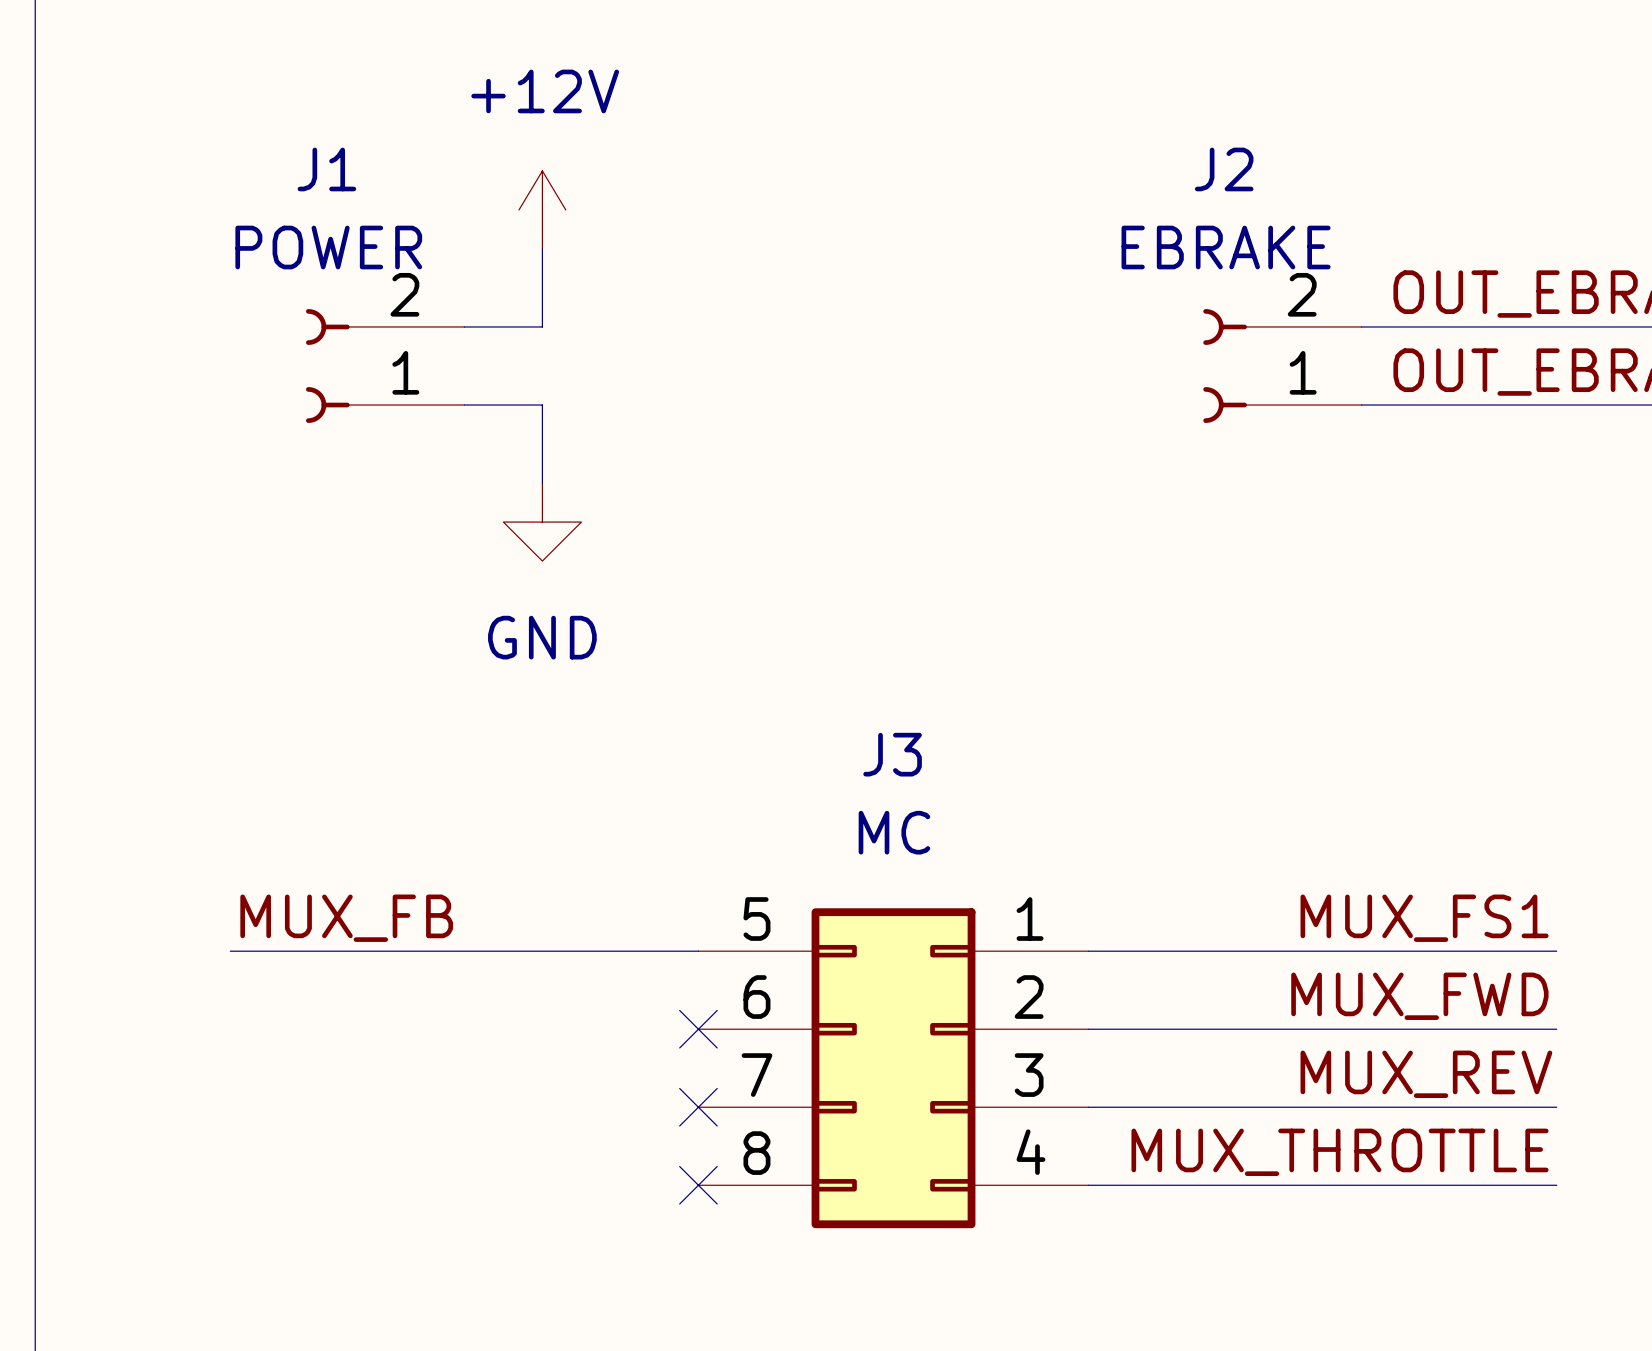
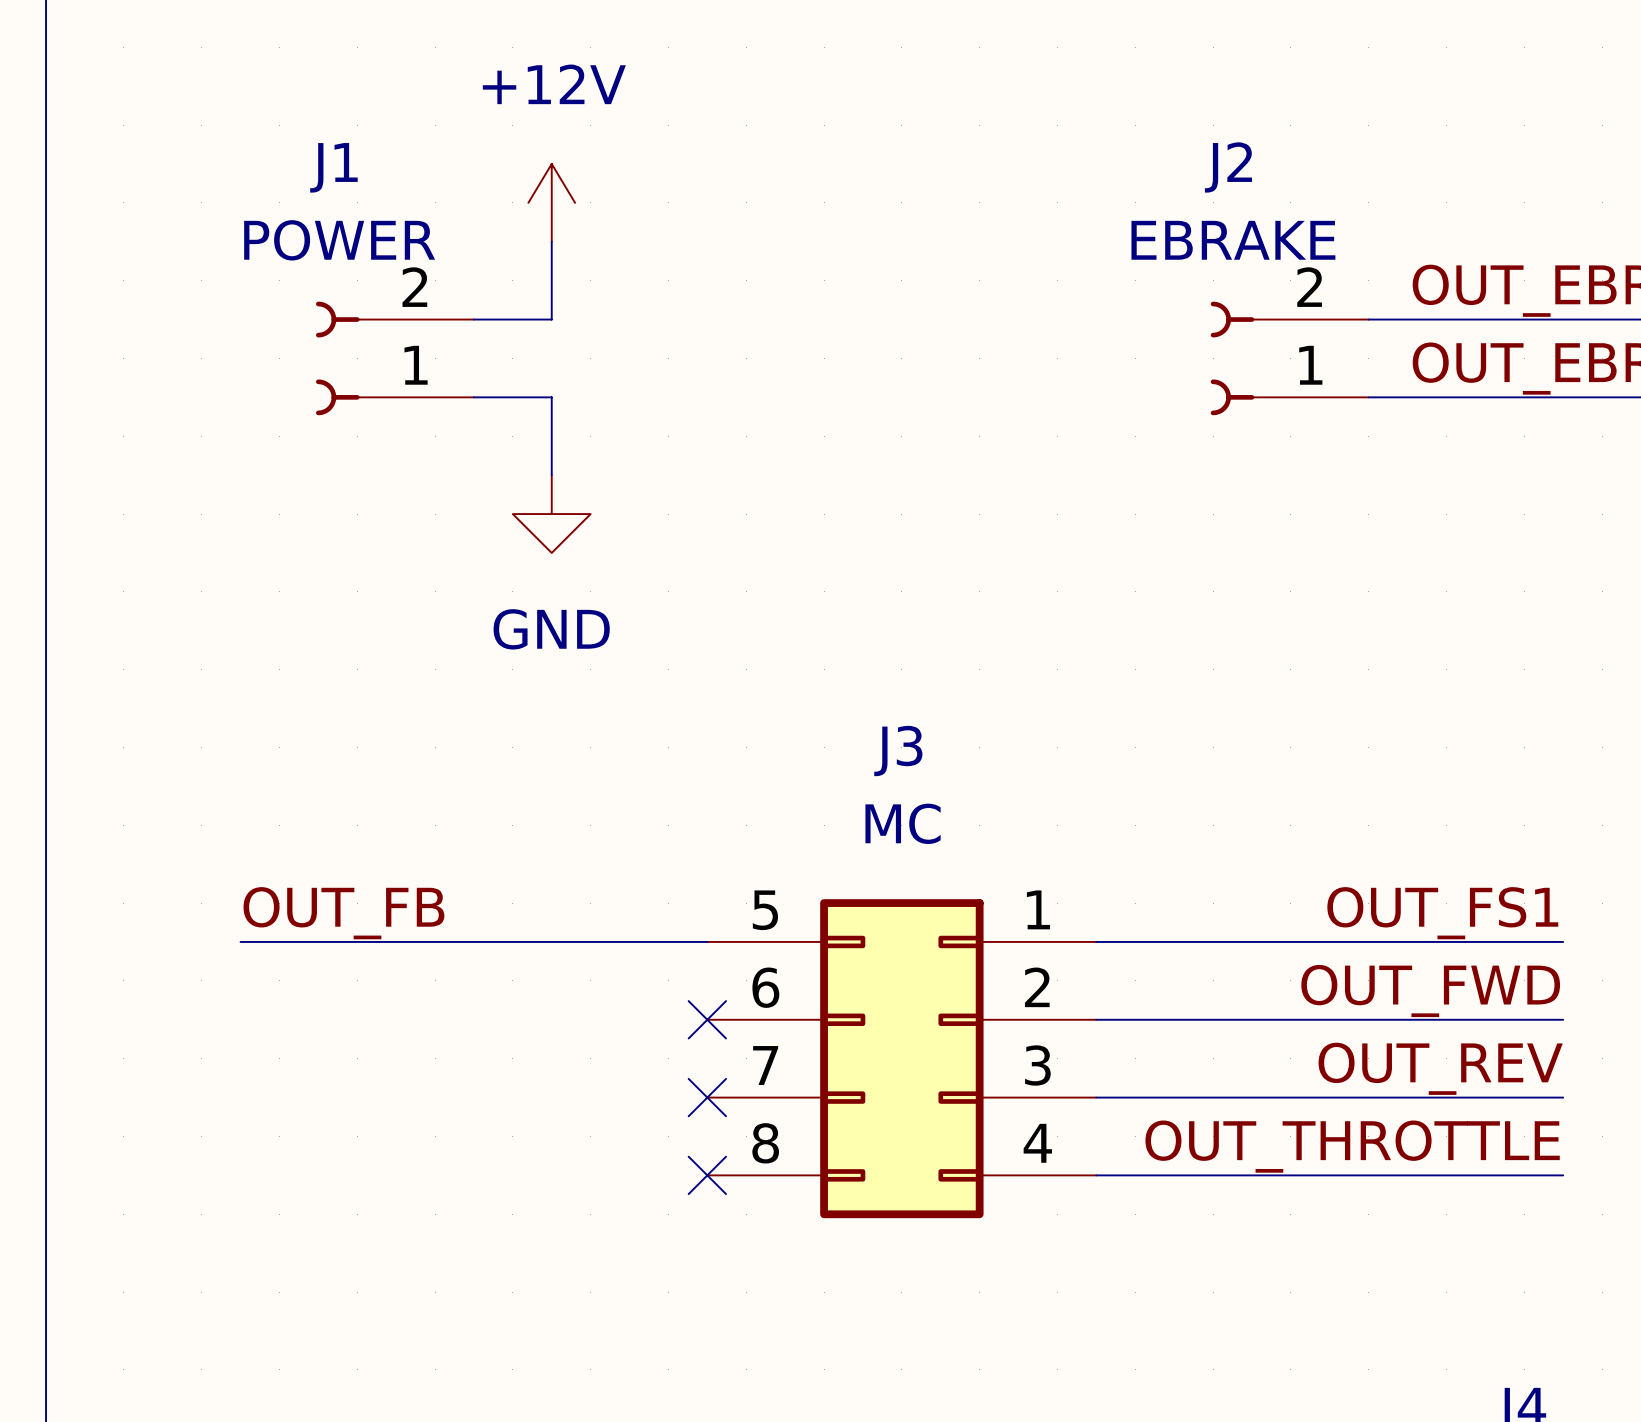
label: MUX_FB (346, 918) -> OUT_FB (343, 913)
label: MUX_FS1 (1424, 918) -> OUT_FS1 (1442, 913)
label: MUX_FWD (1419, 996) -> OUT_FWD (1430, 991)
label: MUX_REV (1426, 1074) -> OUT_REV (1440, 1068)
label: MUX_THROTTLE (1340, 1152) -> OUT_THROTTLE (1352, 1146)

